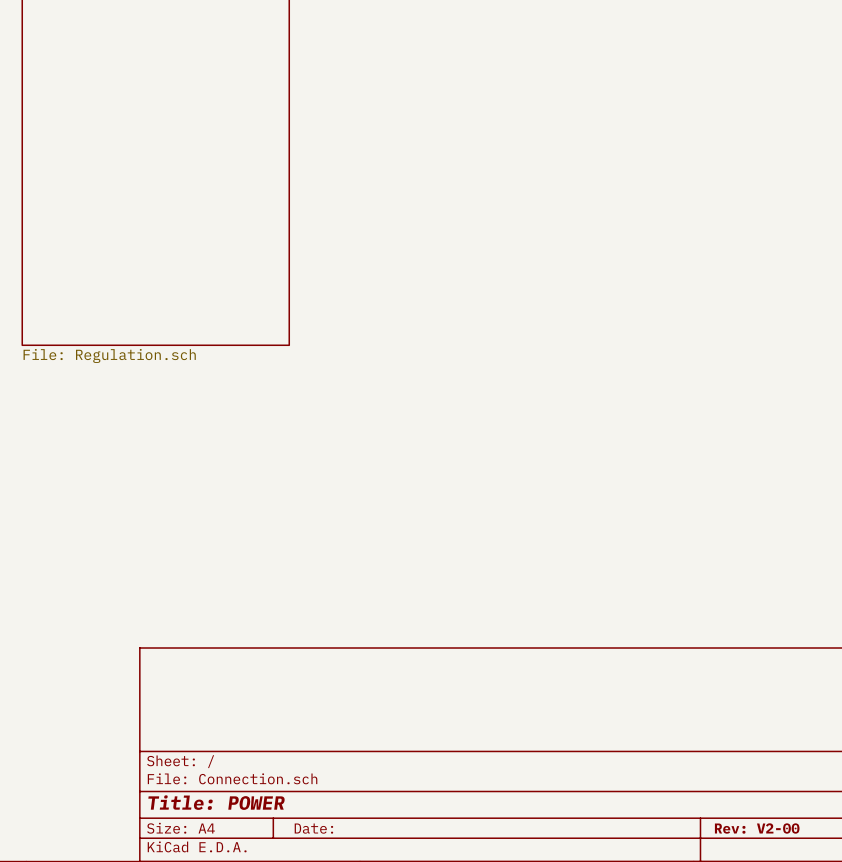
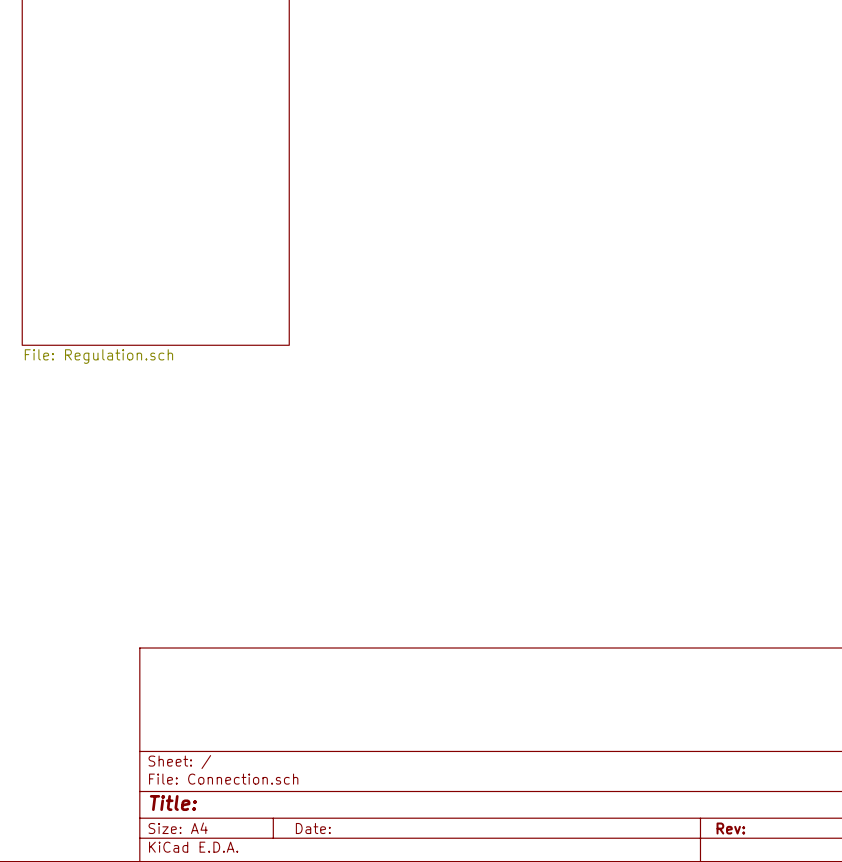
title block: Title: POWER (216, 802) -> Title: (173, 803)
title block: Rev: V2-00 (757, 828) -> Rev: (730, 828)

